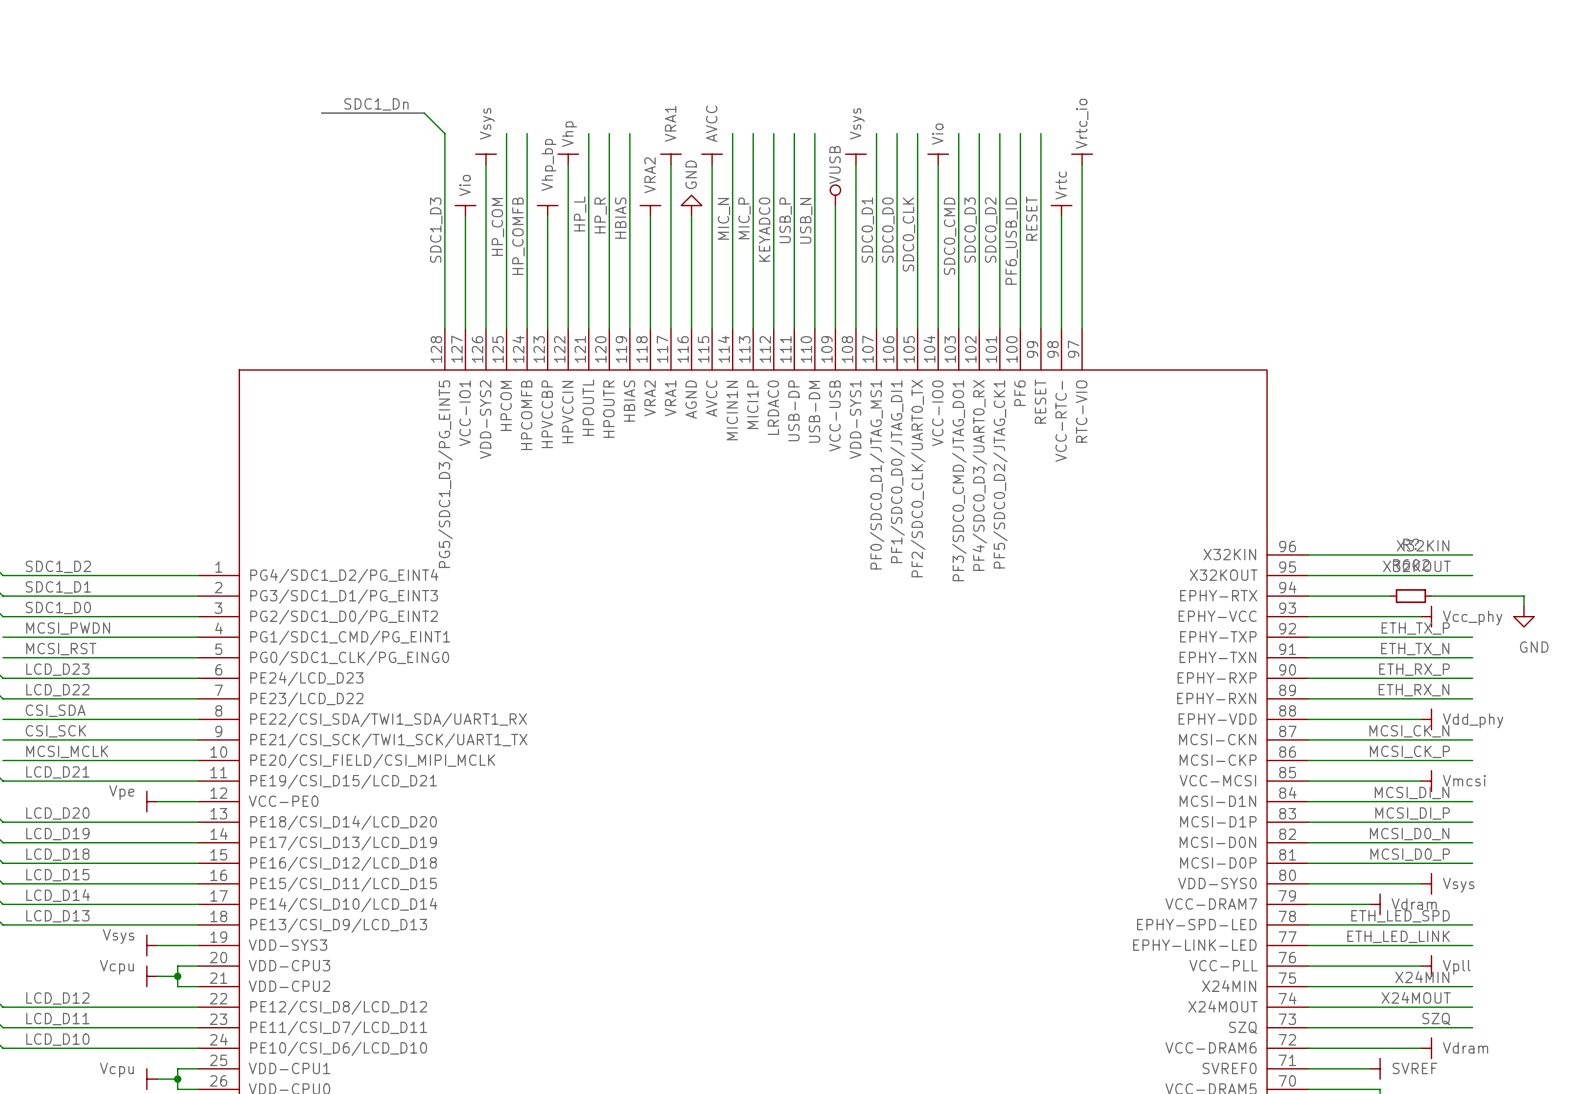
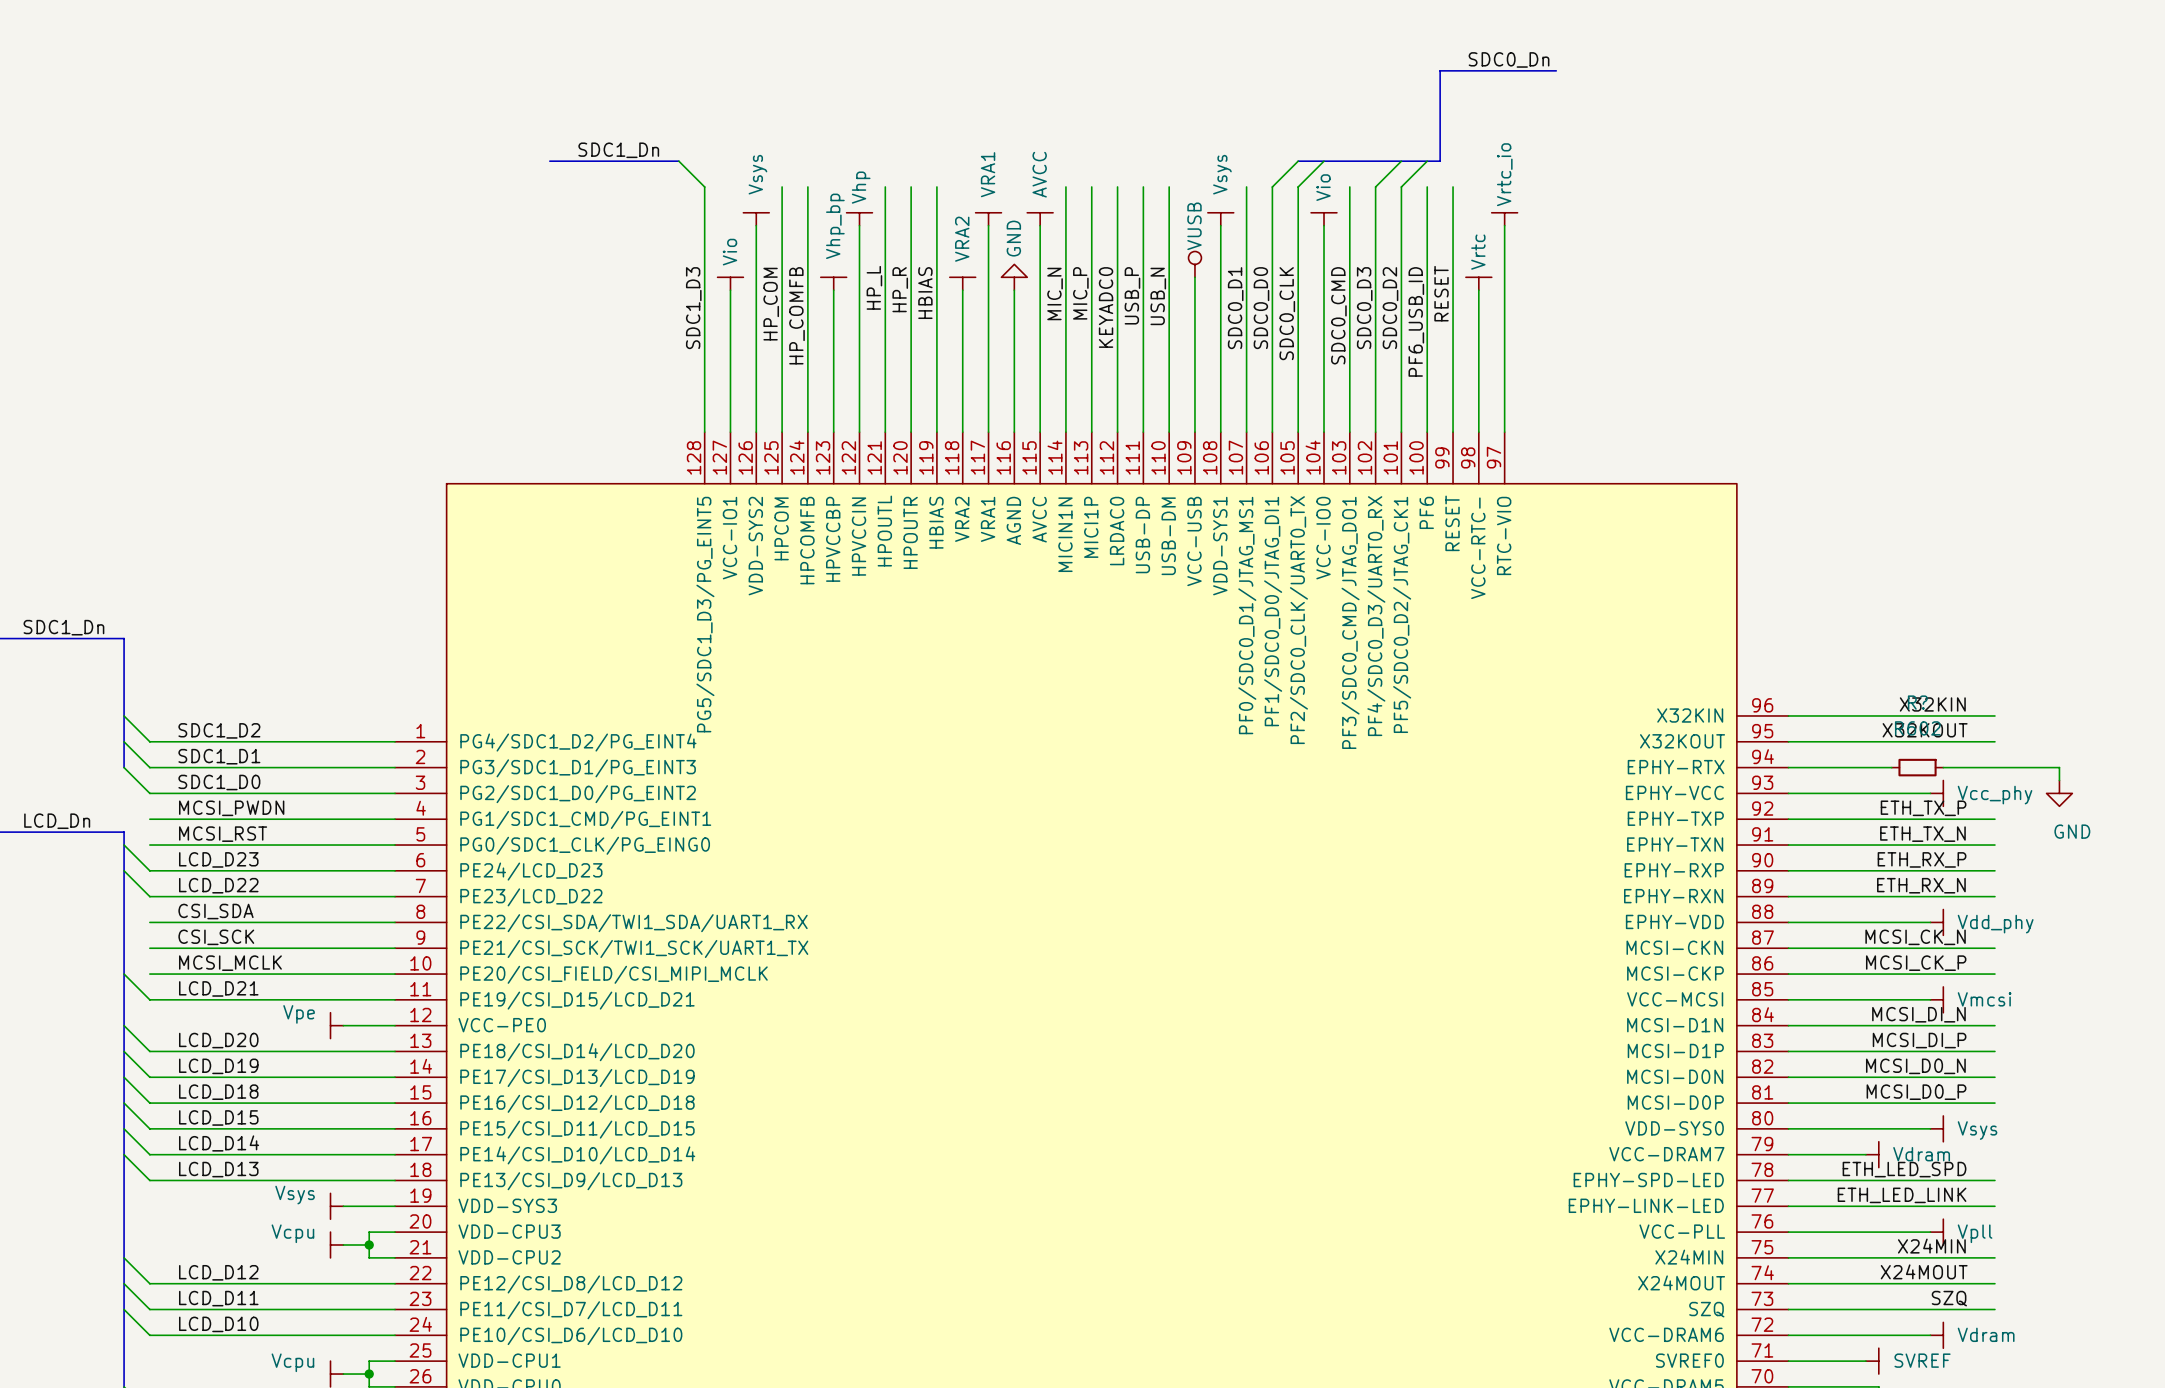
label: none -> SDC0_Dn (1509, 59)
bus: none -> (1556, 70) (1440, 70) (1440, 161) (1298, 161)
wire: none -> (1298, 161) (1272, 186)
wire: none -> (1324, 161) (1298, 186)
wire: none -> (1401, 161) (1375, 186)
wire: none -> (1427, 161) (1401, 186)

